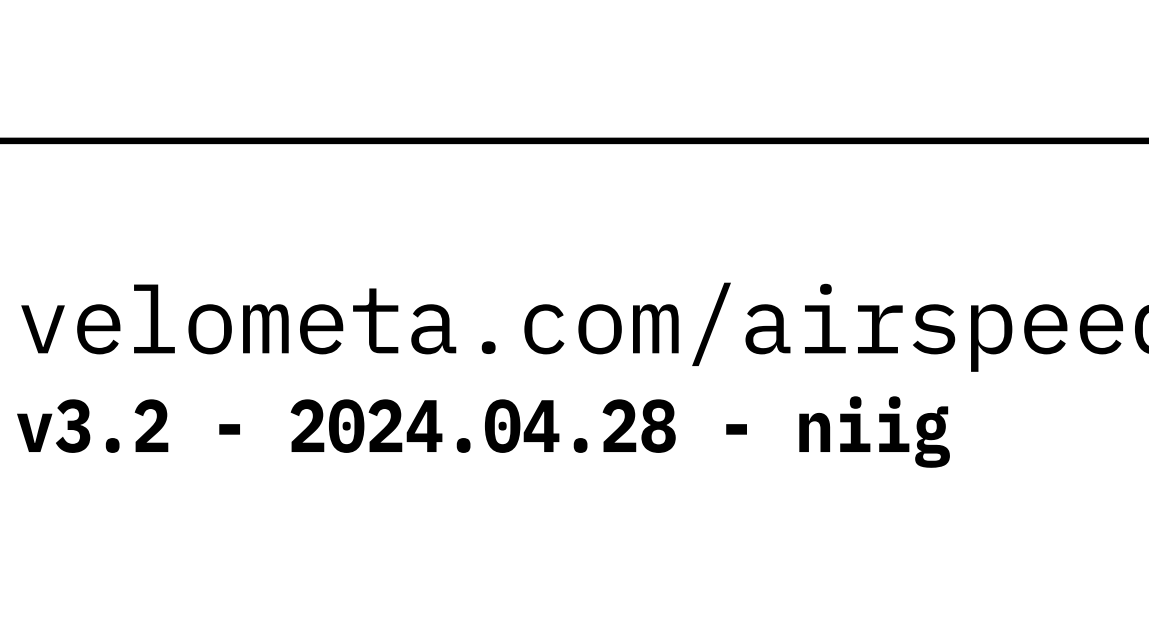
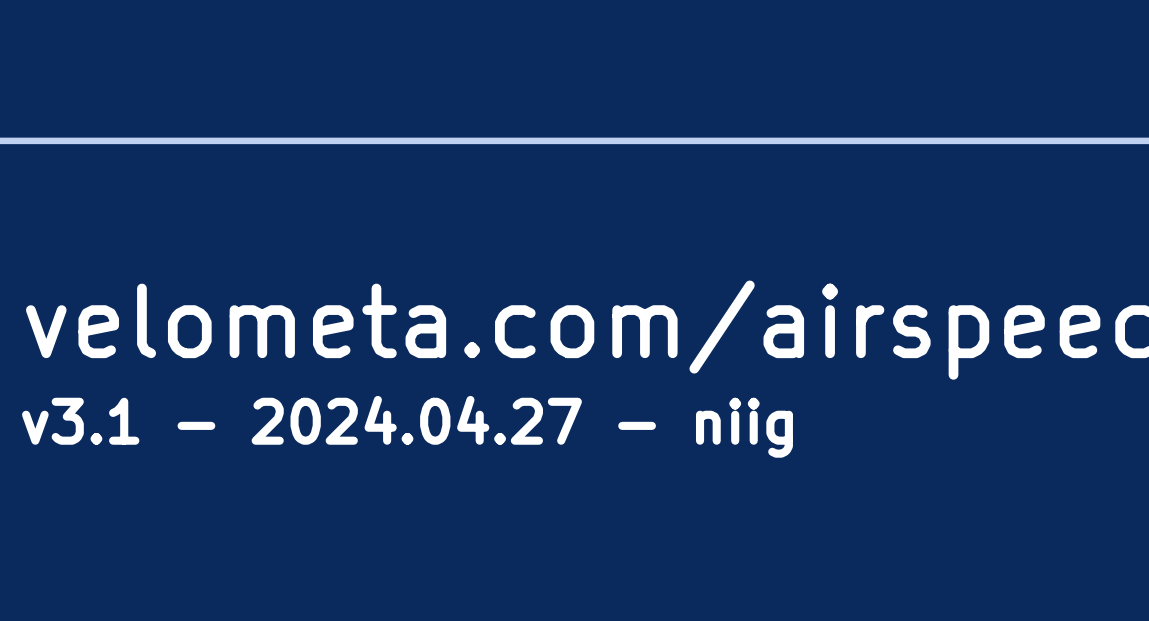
text: v3.2 - 2024.04.28 - niig (483, 432) -> v3.1 - 2024.04.27 - niig (407, 426)

